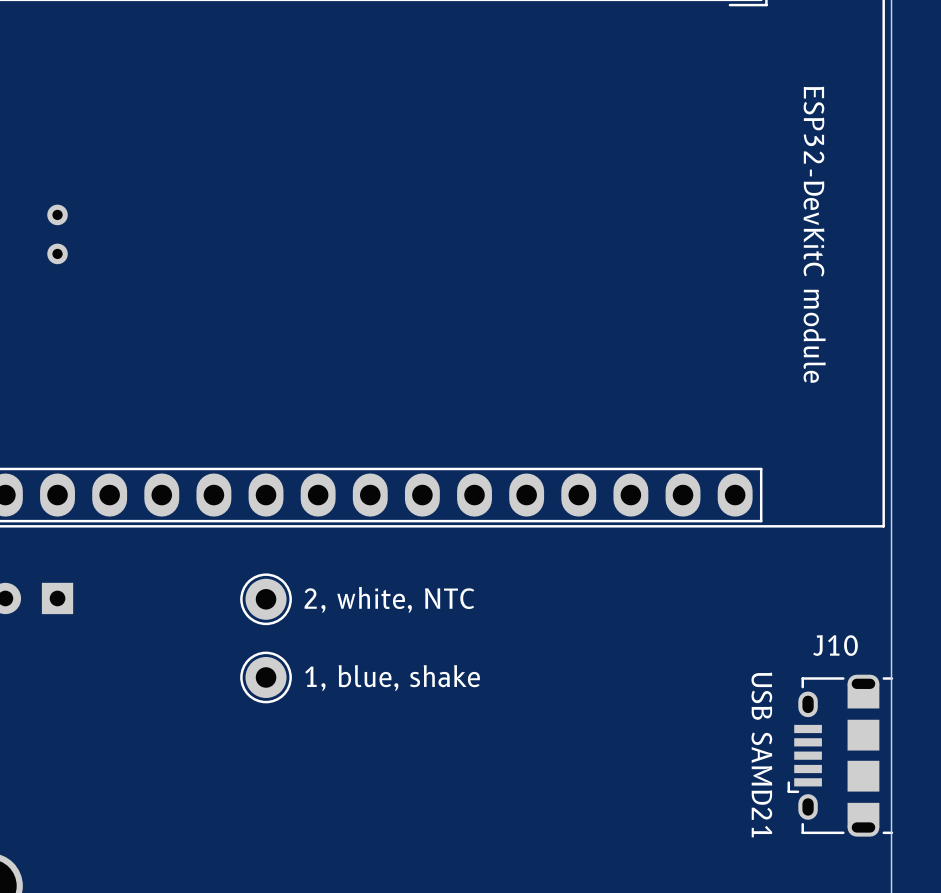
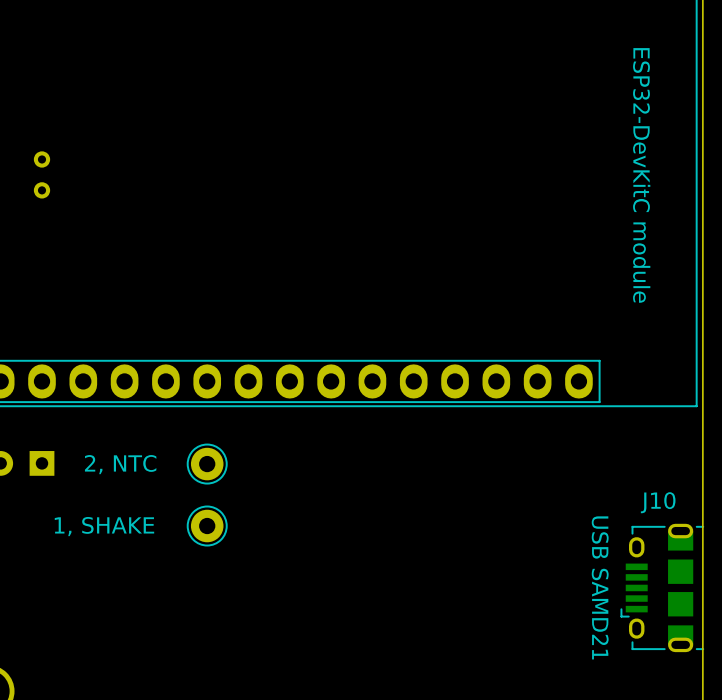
text: 2, white, NTC (389, 599) -> none
text: none -> 2, NTC (120, 464)
text: none -> 1, SHAKE (104, 526)
text: 1, blue, shake (392, 678) -> none

